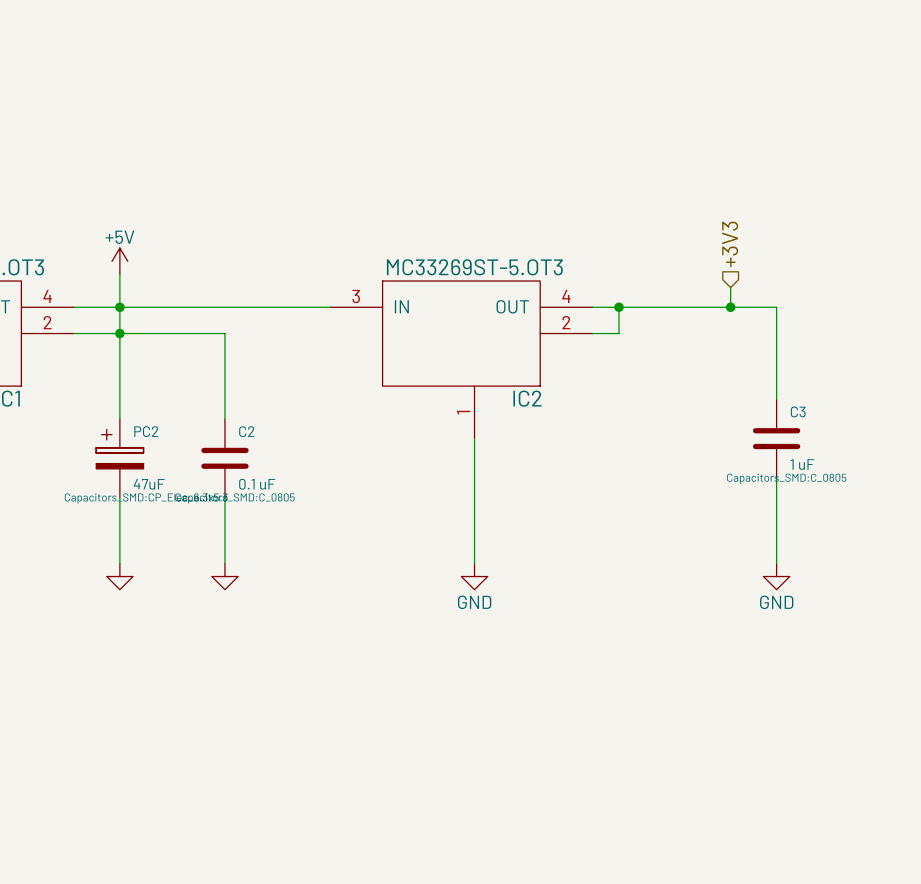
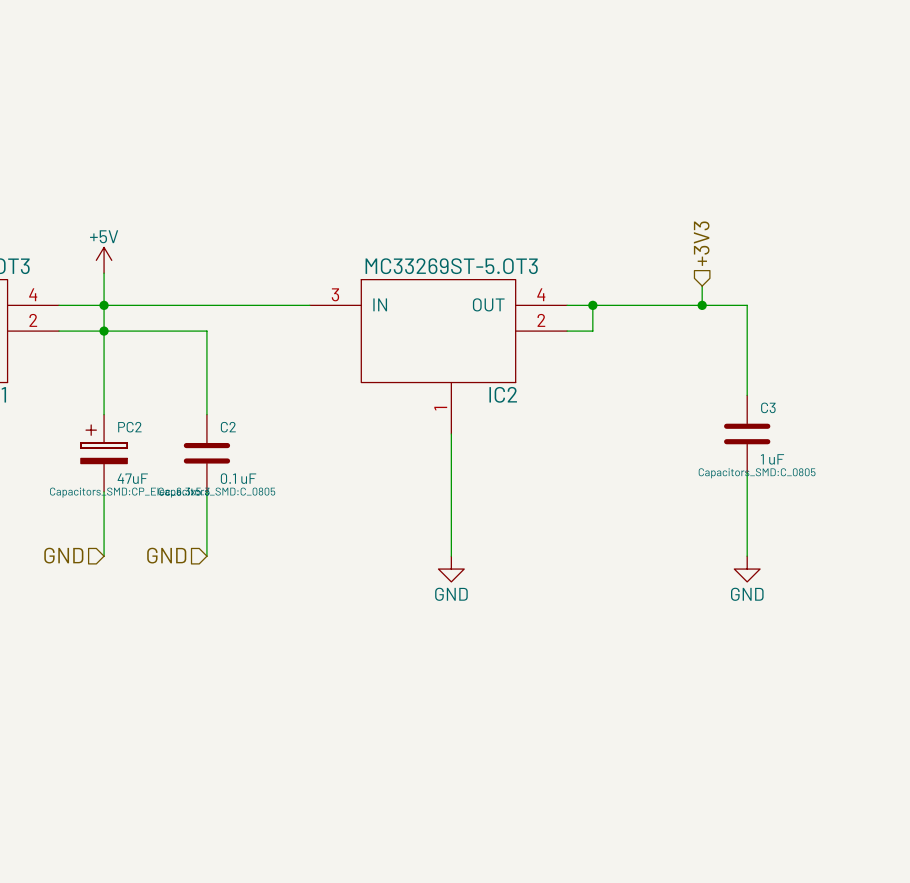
hierarchical label: none -> GND (63, 555)
hierarchical label: none -> GND (166, 555)
power symbol: (119, 576) -> none
power symbol: (224, 576) -> none

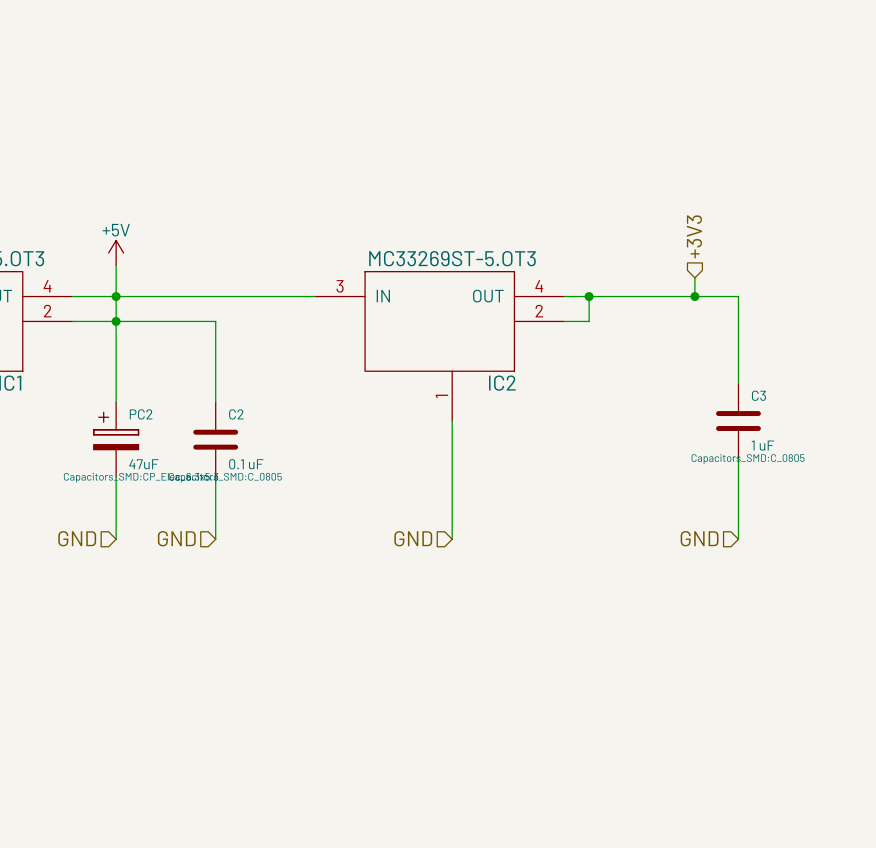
hierarchical label: none -> GND (413, 538)
hierarchical label: none -> GND (699, 538)
power symbol: GND (451, 569) -> none
power symbol: GND (747, 569) -> none

